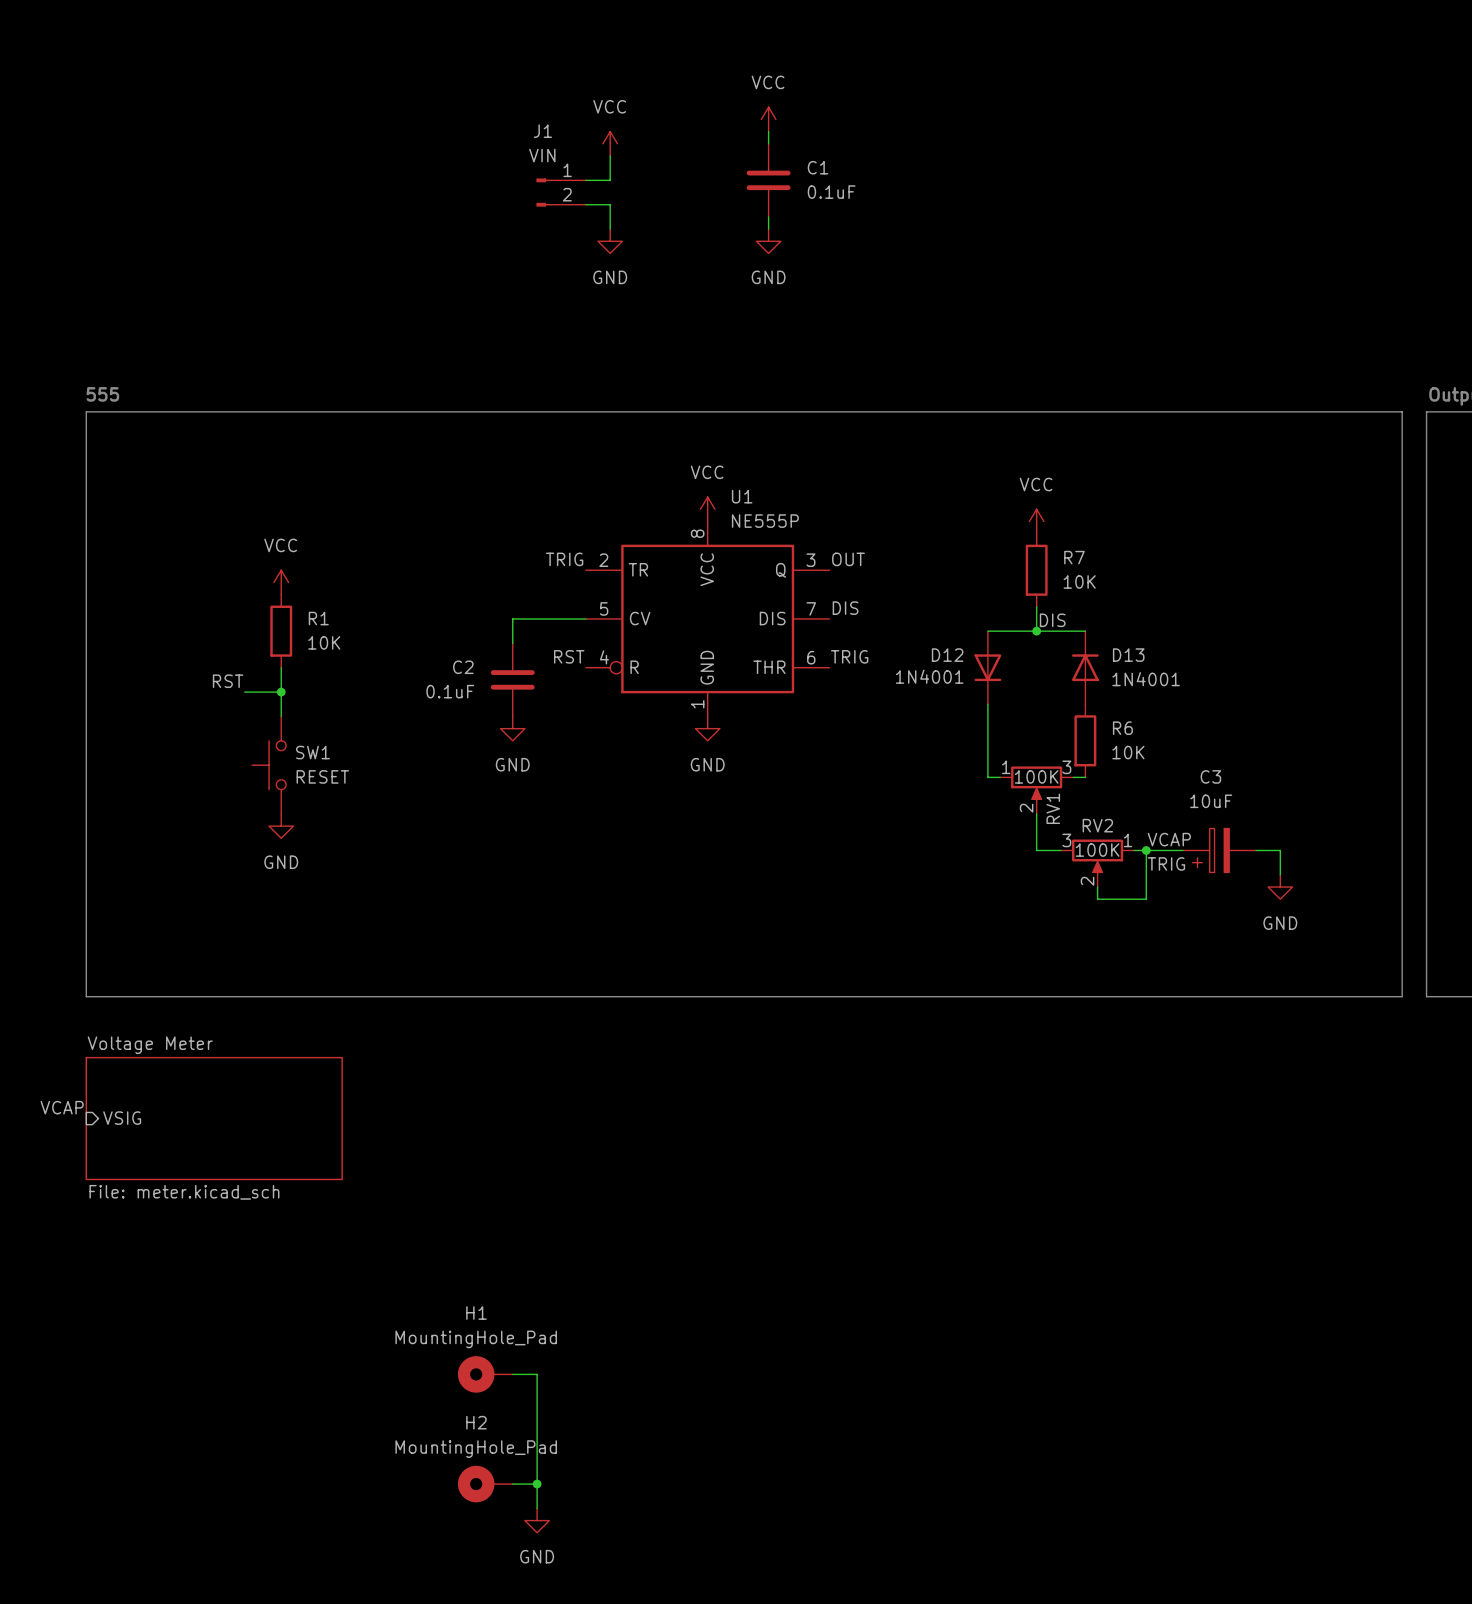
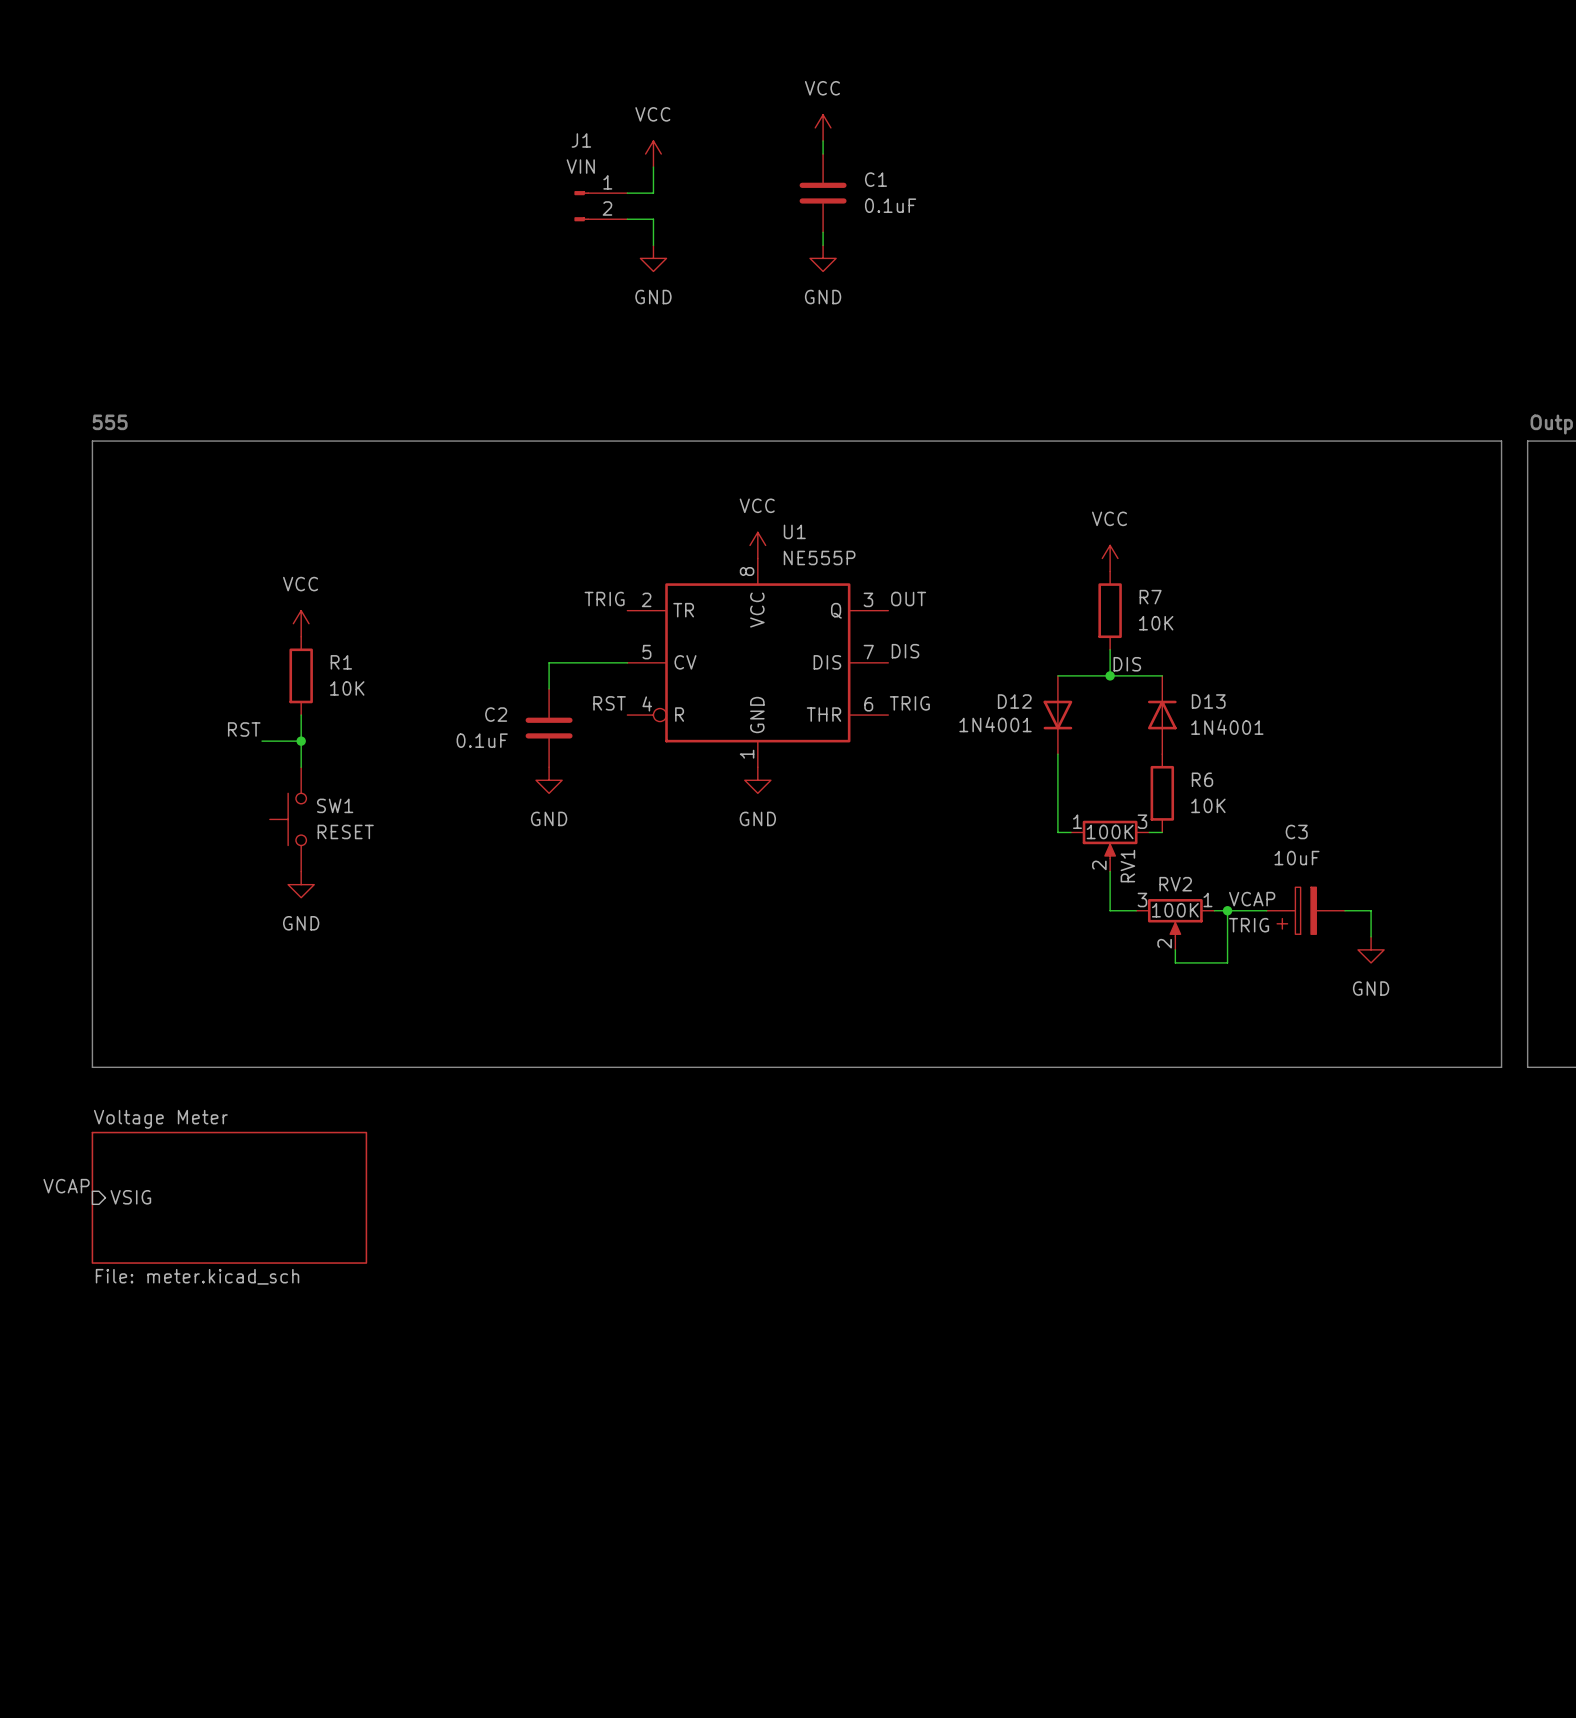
H1: MountingHole_Pad (485, 1374) -> none
wire: (512, 1374) (537, 1374) (537, 1508) -> none
H2: MountingHole_Pad (485, 1484) -> none
wire: (512, 1484) (537, 1484) -> none
junction: (537, 1484) -> none
power symbol: GND (537, 1520) -> none

